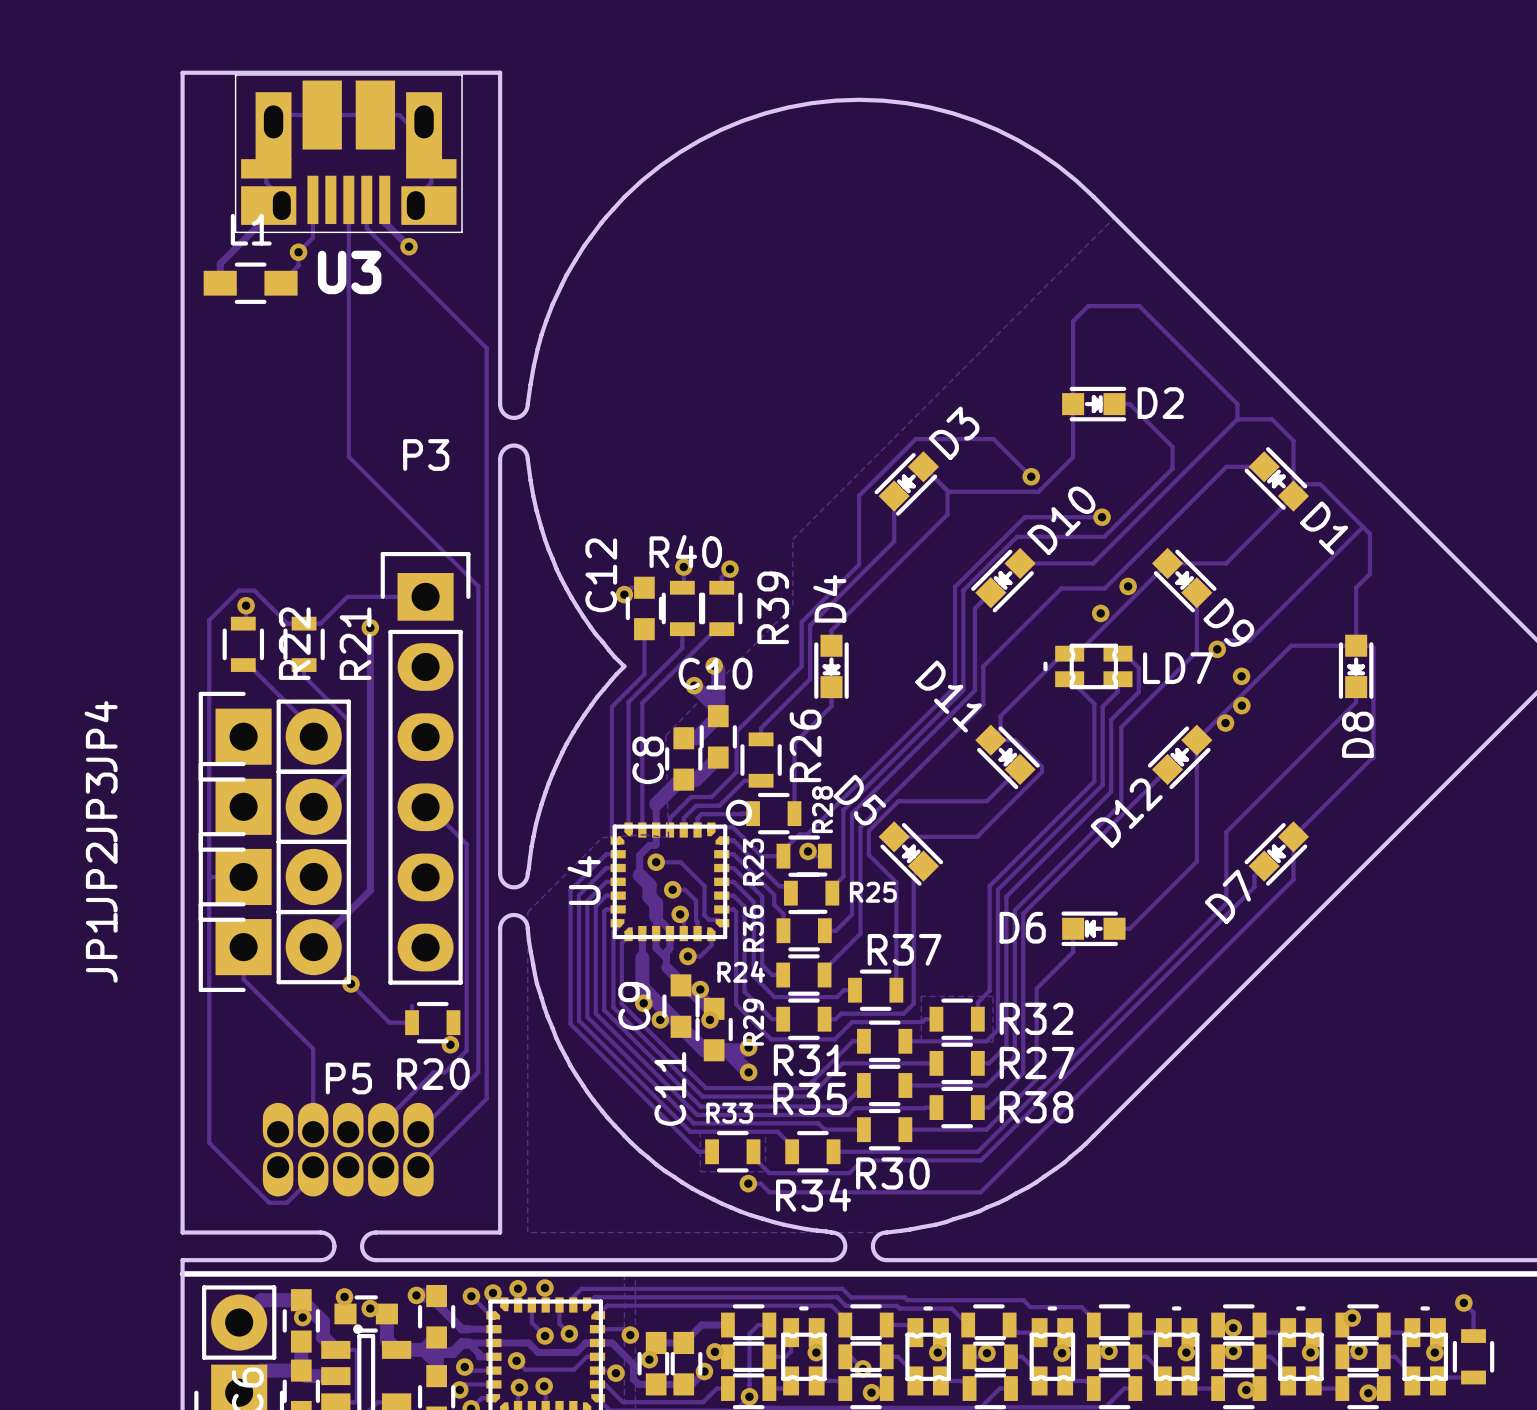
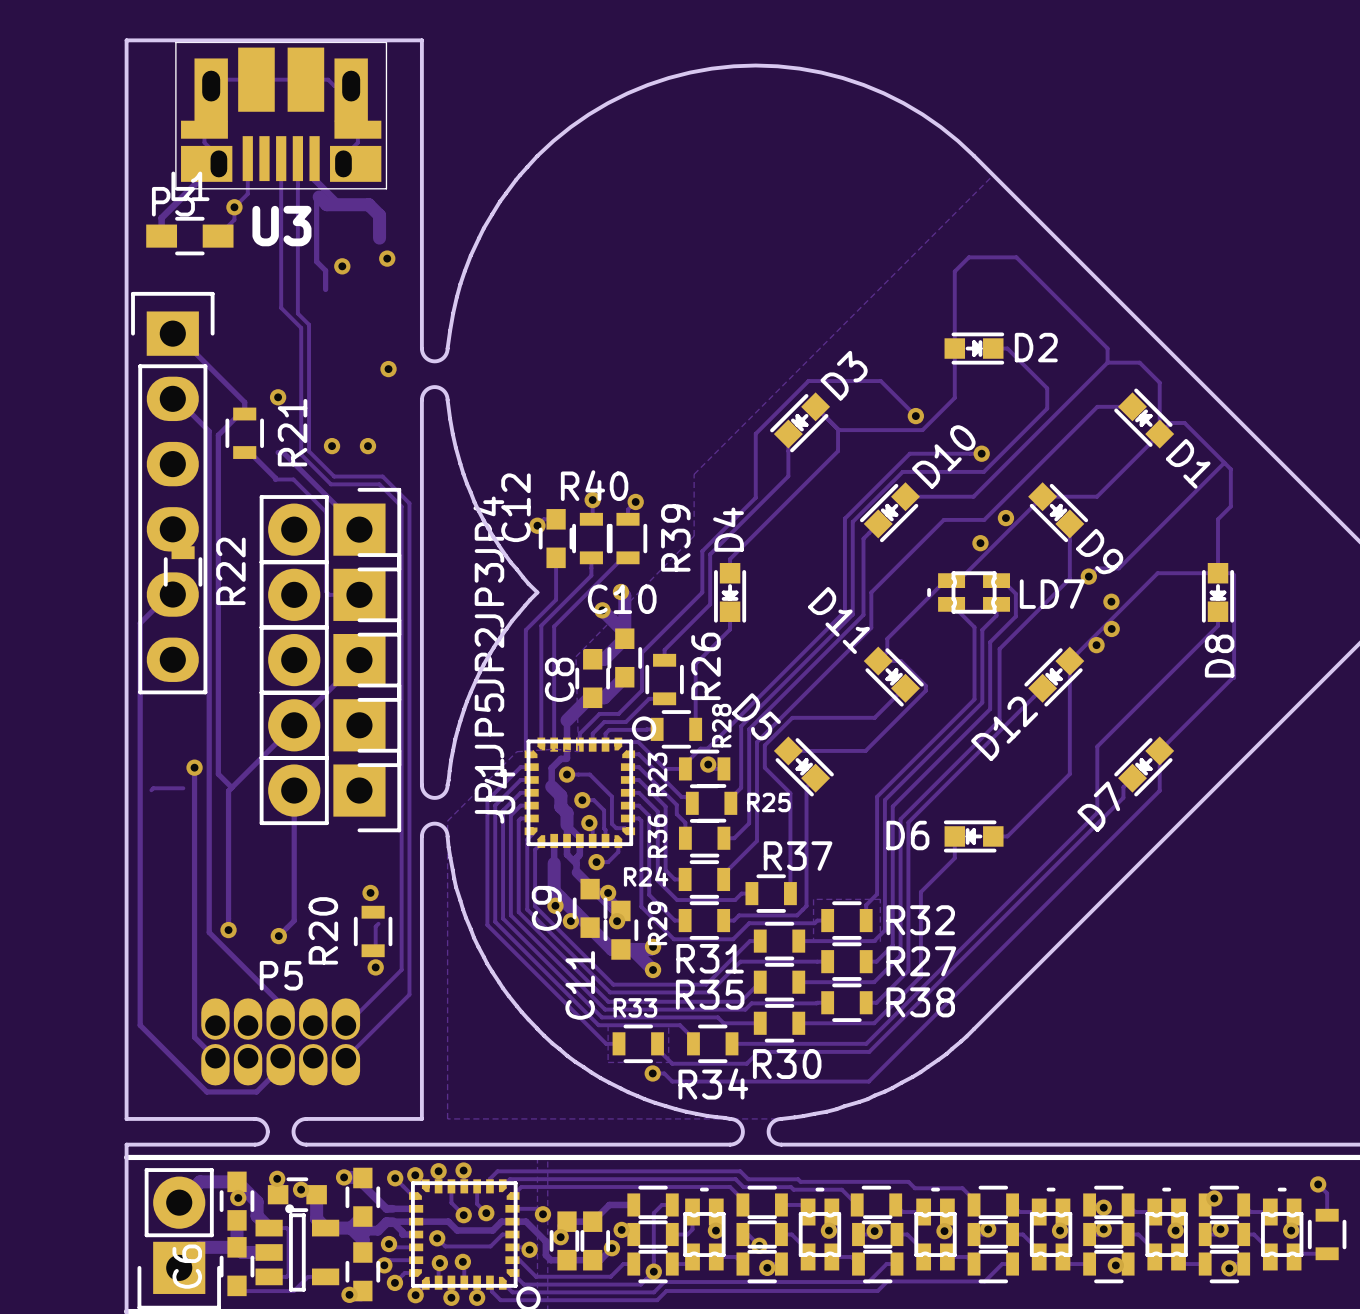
track: (366, 228) (486, 348) (486, 570) -> (297, 184) (297, 313) (309, 324) (309, 451) (334, 476) (382, 476) (409, 503)
via: (409, 246) -> none
track: none -> (379, 238) (379, 215) (368, 204) (326, 204) (319, 197) (316, 199) (316, 261) (325, 270) (325, 289)
via: none -> (387, 258)
via: none -> (342, 266)
track: (348, 360) (348, 456) (478, 586) -> (281, 307) (301, 327) (301, 454) (330, 484) (379, 484) (401, 506) (401, 518)
track: none -> (172, 333) (175, 333) (244, 402) (244, 414) (239, 414) (218, 435) (218, 774) (231, 787)
via: none -> (388, 369)
via: none -> (278, 397)
track: none -> (172, 398) (176, 398) (209, 431) (209, 932) (280, 1003) (280, 1025)
via: none -> (332, 446)
via: none -> (367, 446)
track: none -> (244, 452) (249, 452) (275, 479) (293, 479) (326, 512) (326, 591) (329, 594) (359, 594)
track: none -> (278, 452) (283, 452) (359, 529)
track: (425, 596) (347, 596) (320, 623) (287, 623) (254, 590) (238, 590) (209, 620) (209, 1142) (269, 1202) (287, 1202) (313, 1176) (313, 1167) -> none
via: (246, 605) -> none
track: (370, 627) (370, 890) (313, 947) -> none
via: (370, 627) -> none
R21 position: (304, 644) -> (244, 433)
track: (243, 665) (248, 665) (313, 729) (313, 736) -> none
track: (304, 665) (304, 676) (348, 720) (348, 772) (313, 806) -> none
track: none -> (172, 594) (168, 594) (140, 623) (140, 1025) (206, 1091) (256, 1091) (280, 1067) (280, 1058)
JP4 rotation: 0° (274, 736) -> 180° (330, 529)
JP4 position: (274, 736) -> (330, 529)
track: none -> (359, 660) (228, 791) (228, 930)
P3 position: (425, 768) -> (172, 493)
JP3 rotation: 0° (274, 806) -> 180° (330, 594)
JP3 position: (274, 806) -> (330, 594)
track: (425, 807) (429, 807) (466, 844) (466, 1050) (444, 1072) (433, 1072) (383, 1122) -> none
JP5: none -> (330, 725)
track: none -> (194, 767) (194, 1037) (215, 1058)
via: none -> (194, 767)
JP2 rotation: 0° (274, 876) -> 180° (330, 660)
JP2 position: (274, 876) -> (330, 660)
track: none -> (294, 790) (294, 920) (278, 936)
track: (243, 947) (243, 979) (313, 1048) (313, 1132) -> none
JP1 rotation: 0° (274, 947) -> 180° (330, 790)
JP1 position: (274, 947) -> (330, 790)
track: (351, 984) (389, 1022) (412, 1022) (412, 1006) -> none
via: (351, 984) -> none
via: none -> (370, 892)
R20 rotation: 0° (432, 1022) -> 90° clockwise (373, 931)
via: none -> (228, 930)
via: none -> (278, 936)
via position: (450, 1044) -> (375, 967)

